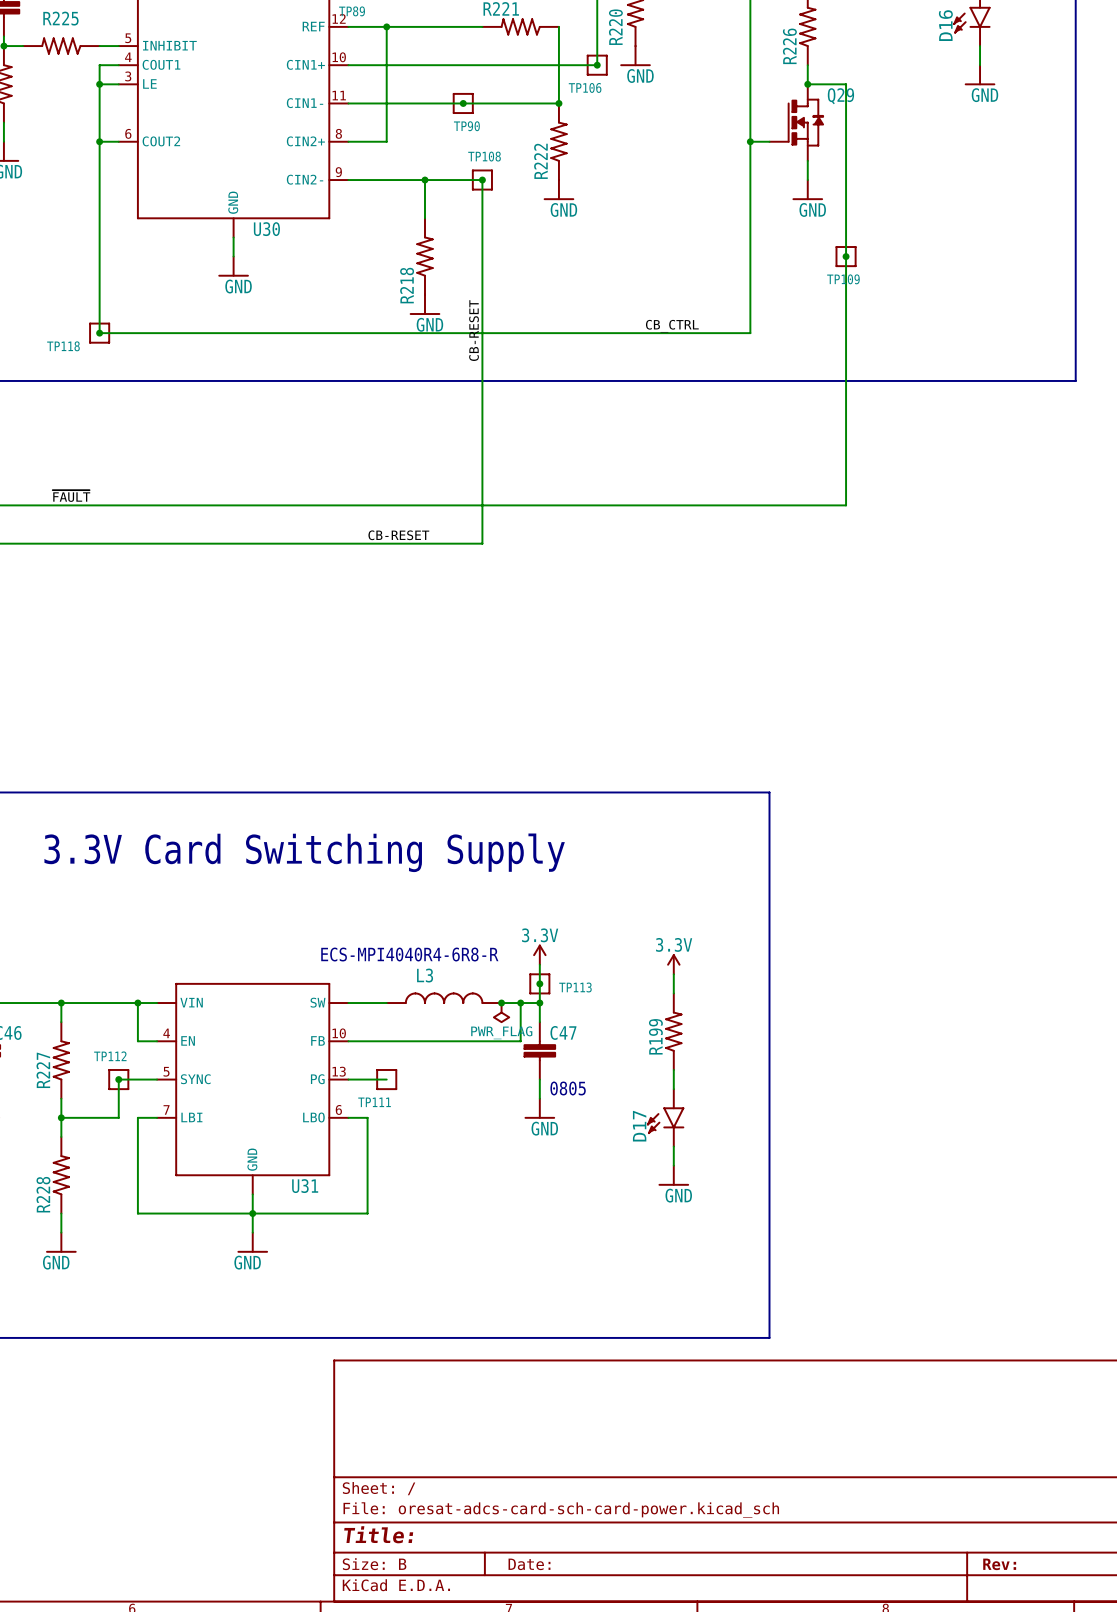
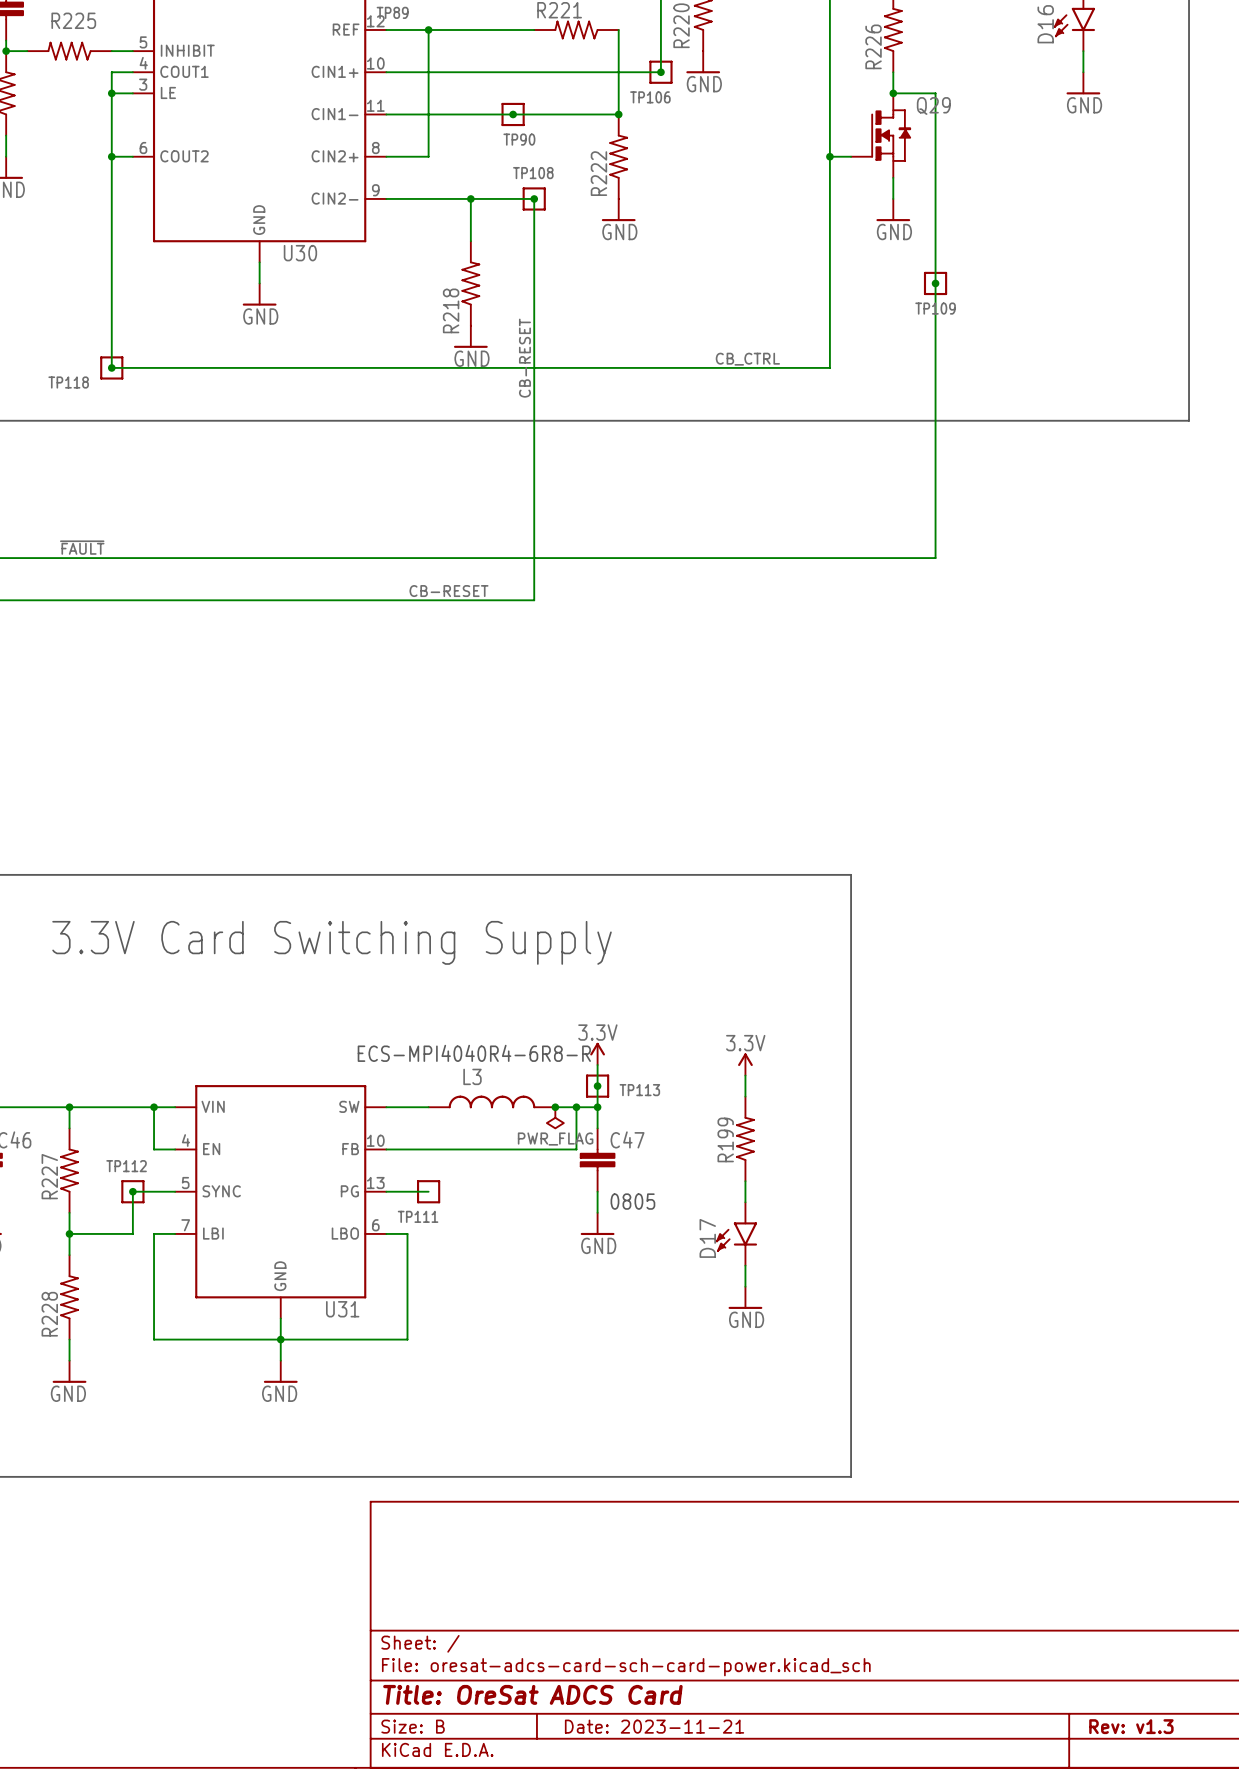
title block: Title: (378, 1534) -> Title: OreSat ADCS Card (532, 1694)
title block: Date: (529, 1564) -> Date: 2023-11-21 (654, 1726)
title block: Rev: (999, 1564) -> Rev: v1.3 (1131, 1726)

